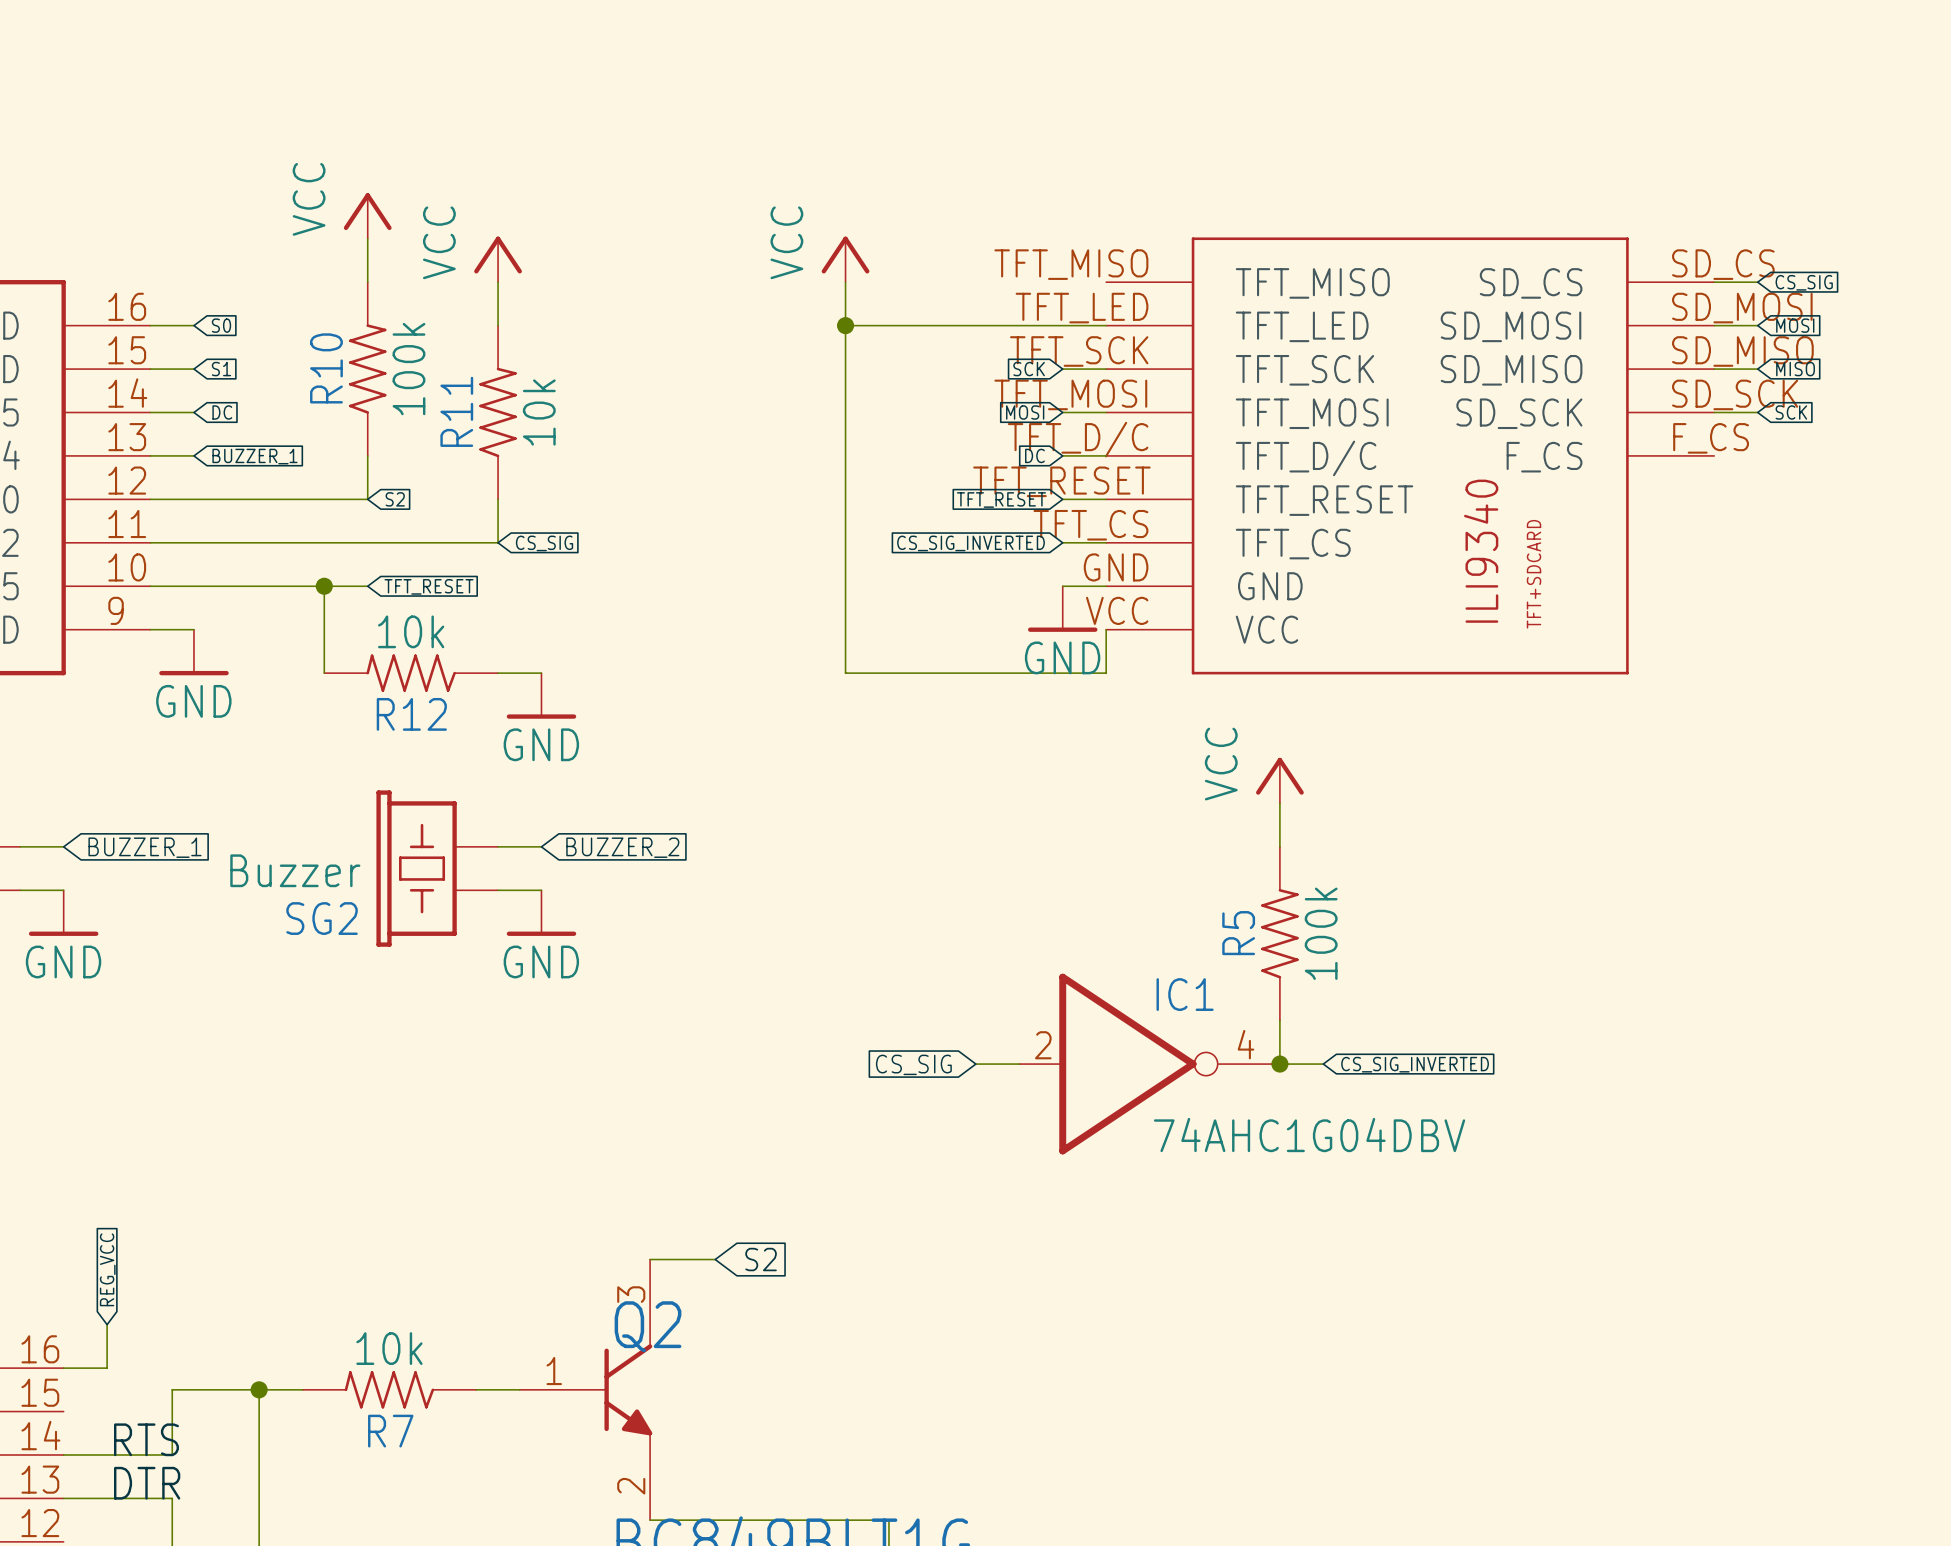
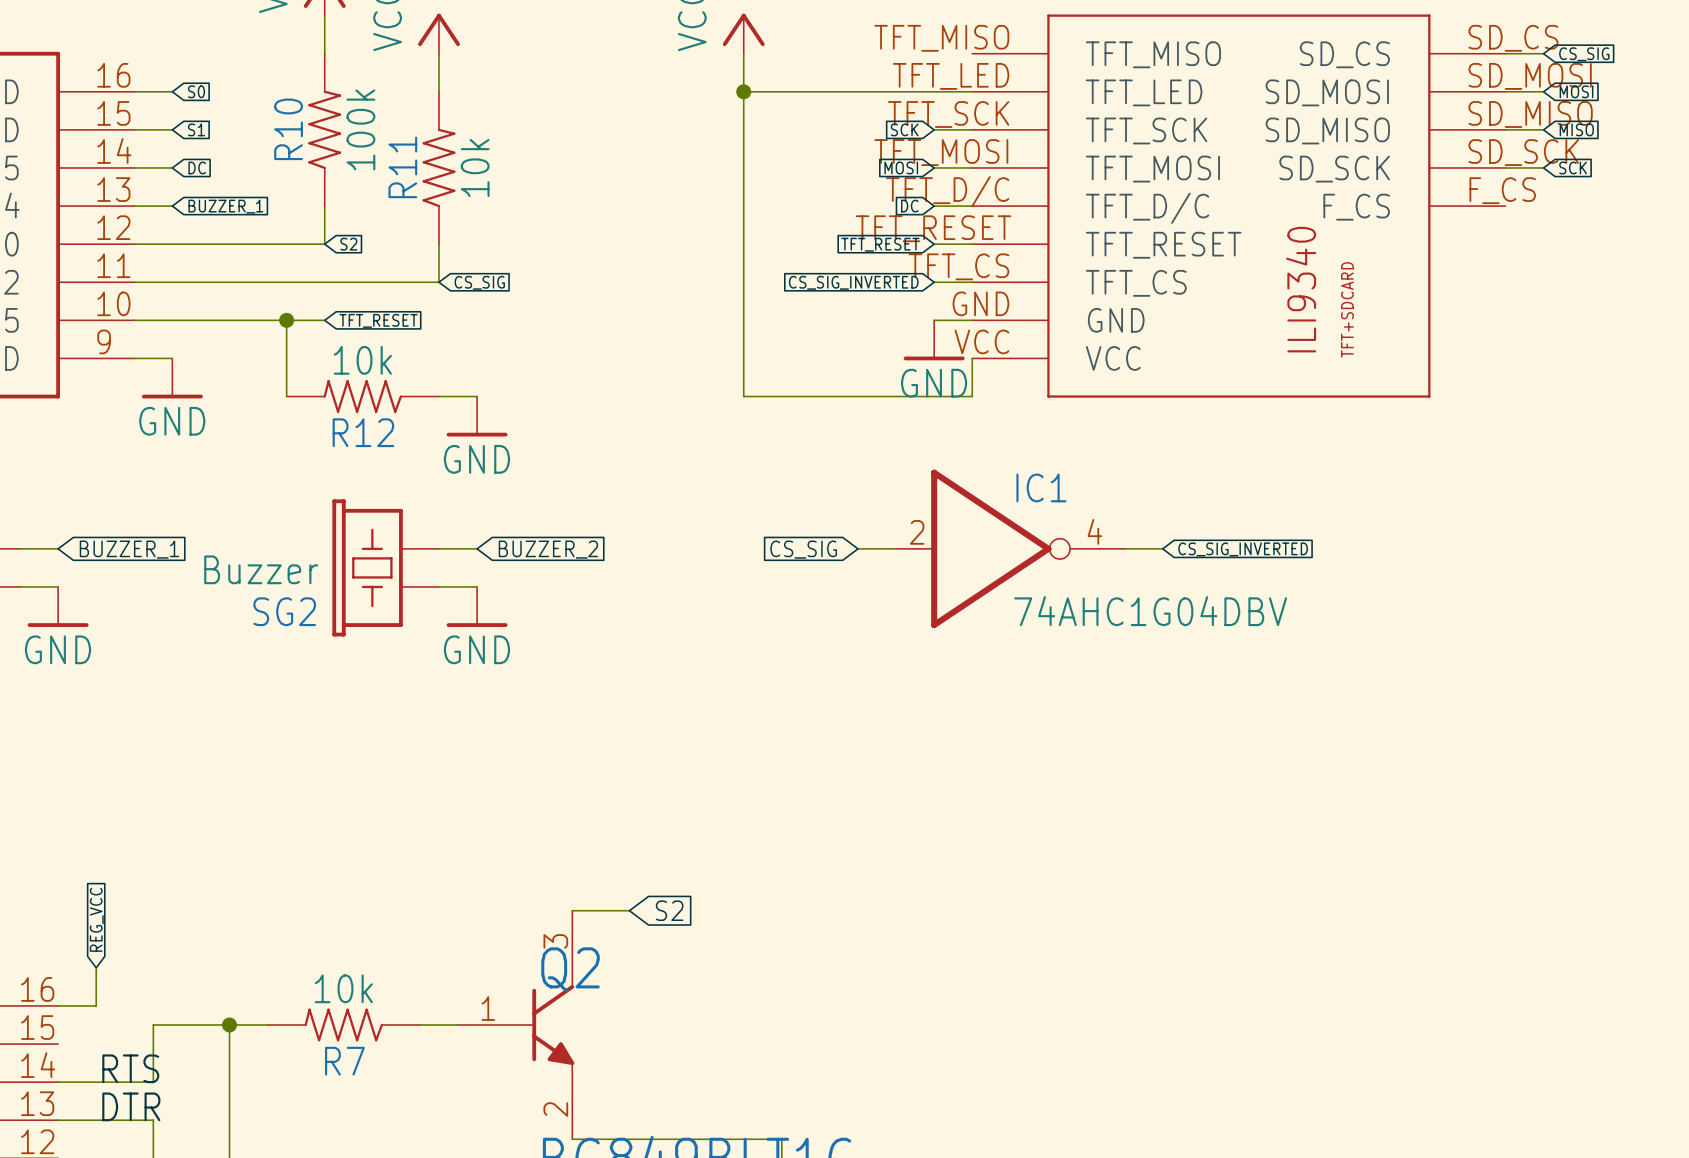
power symbol: VCC (1279, 780) -> none
wire: (1279, 803) (1279, 846) -> (1162, 548) (1124, 548)
R5: 100k (1279, 933) -> none
wire: (1279, 1020) (1279, 1064) (1323, 1064) -> none
global label position: CS_SIG (913, 1064) -> CS_SIG (803, 549)
wire: (975, 1064) (1019, 1064) -> (857, 548) (896, 548)
IC1 position: (1149, 1064) -> (1010, 548)
junction: (1279, 1064) -> none
global label position: CS_SIG_INVERTED (1415, 1064) -> CS_SIG_INVERTED (1243, 549)

